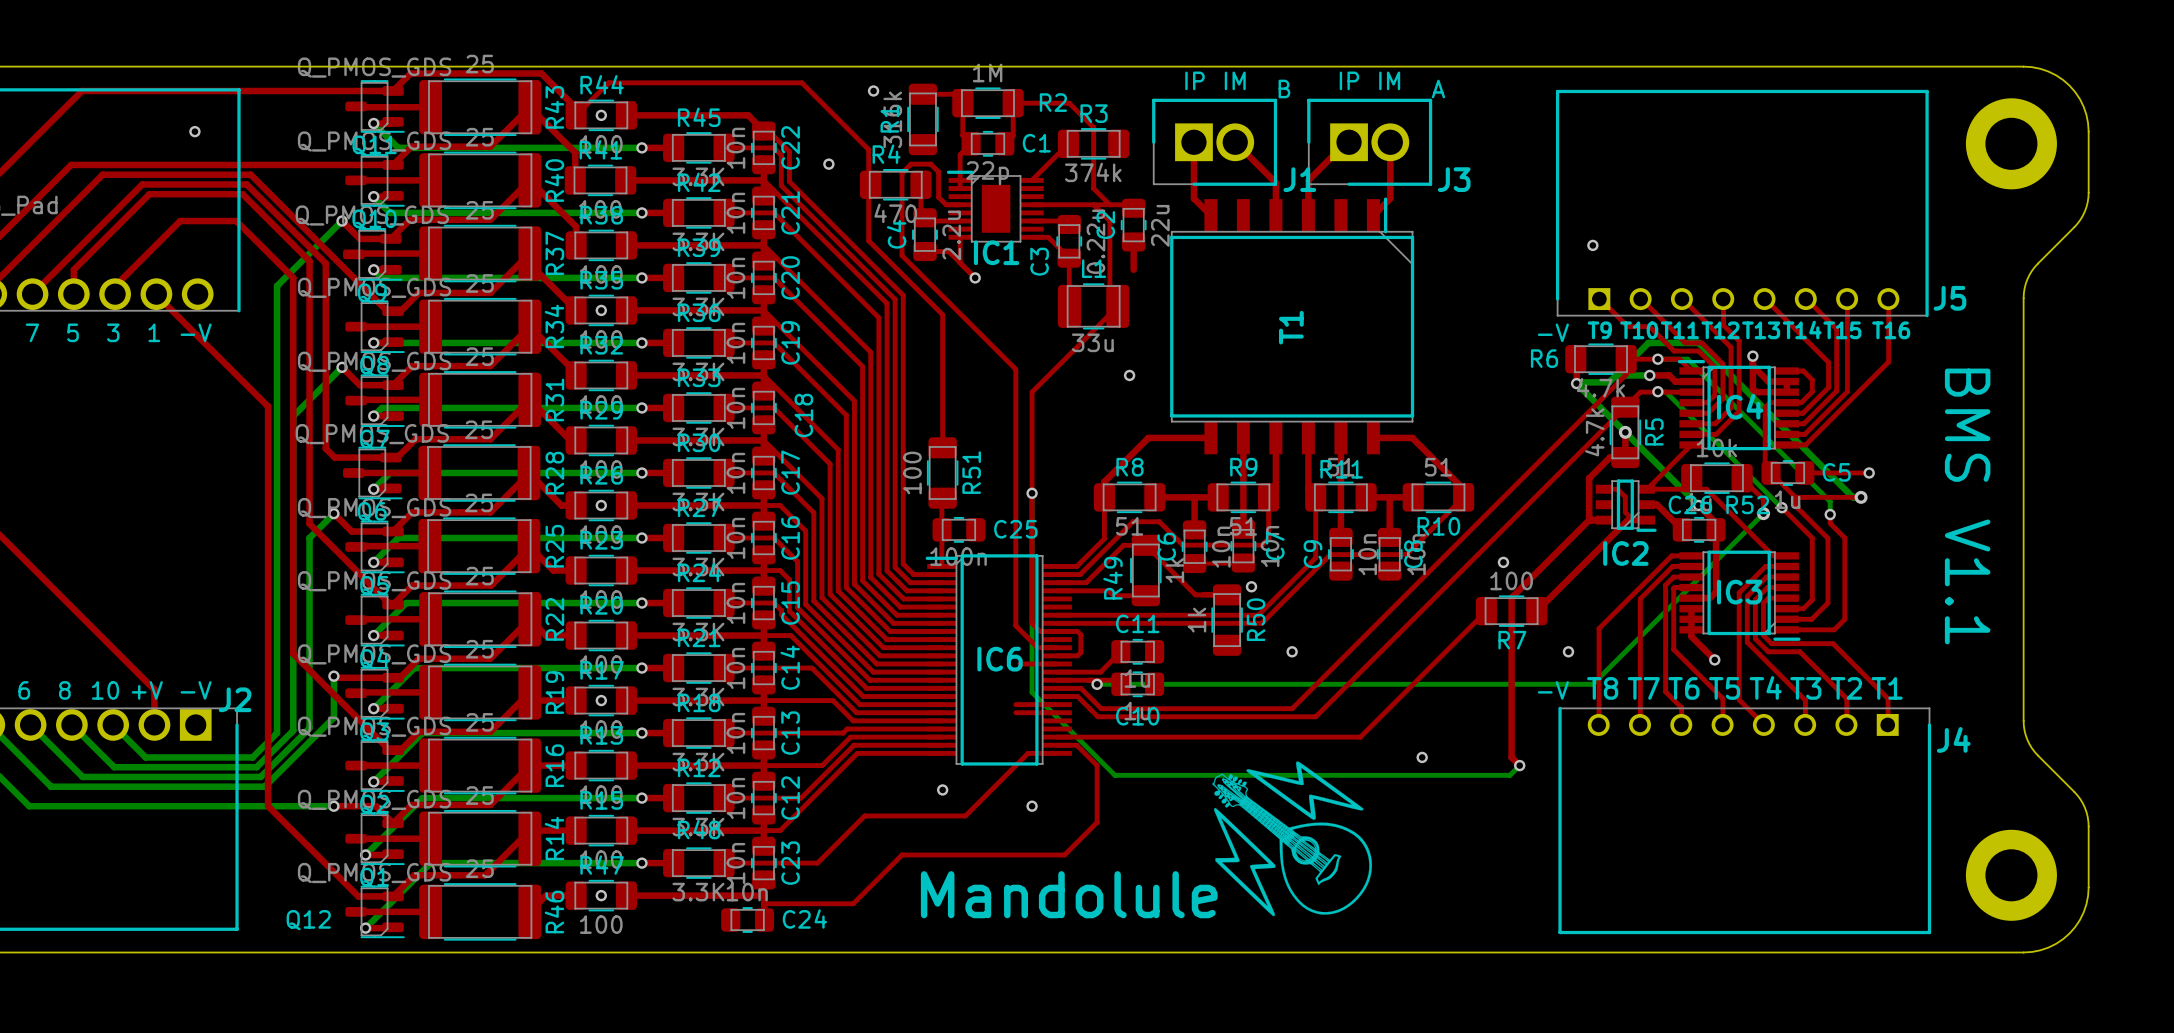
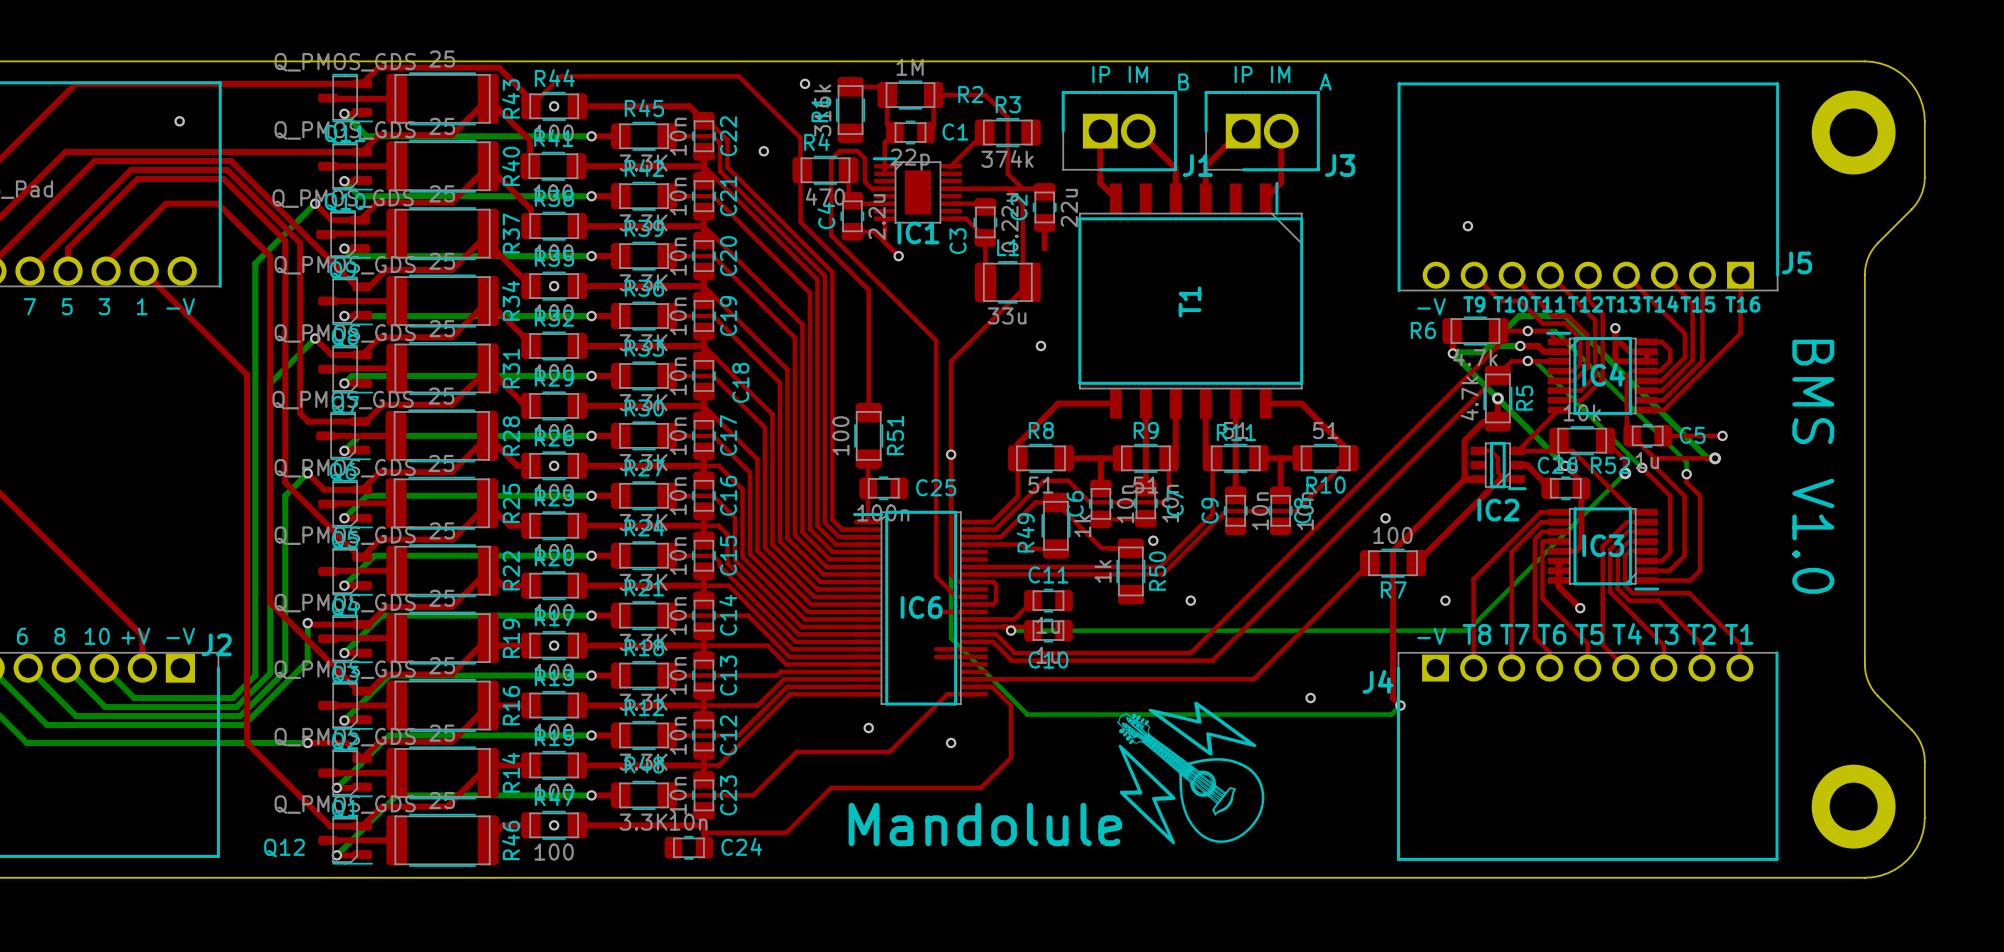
J5 footprint: [1555, 89, 1929, 318] -> [1397, 82, 1780, 293]
text: BMS V1.1 (1967, 506) -> BMS V1.0 (1813, 466)
J4 footprint: [1558, 706, 1932, 935] -> [1396, 651, 1779, 861]
J4 name position: J4 (1953, 739) -> J4 (1378, 681)

